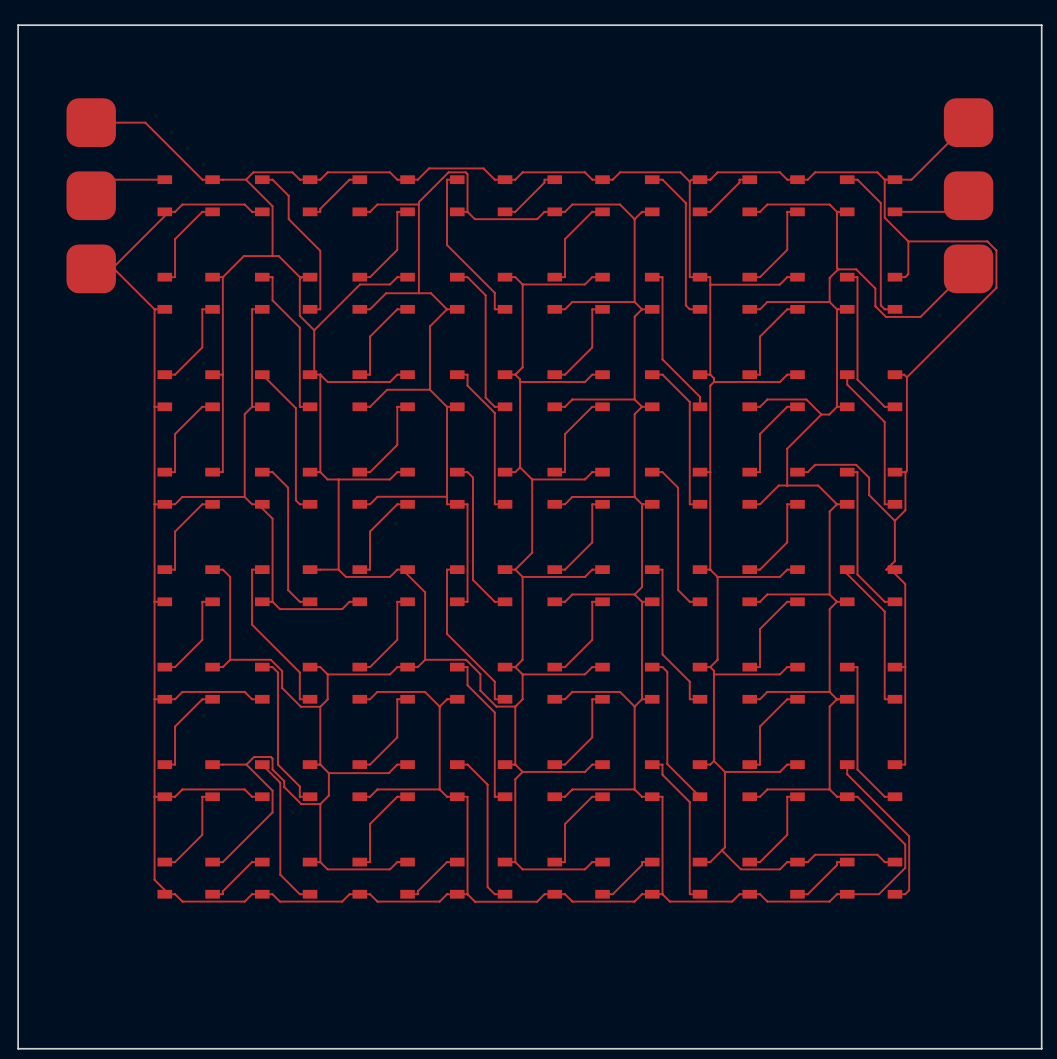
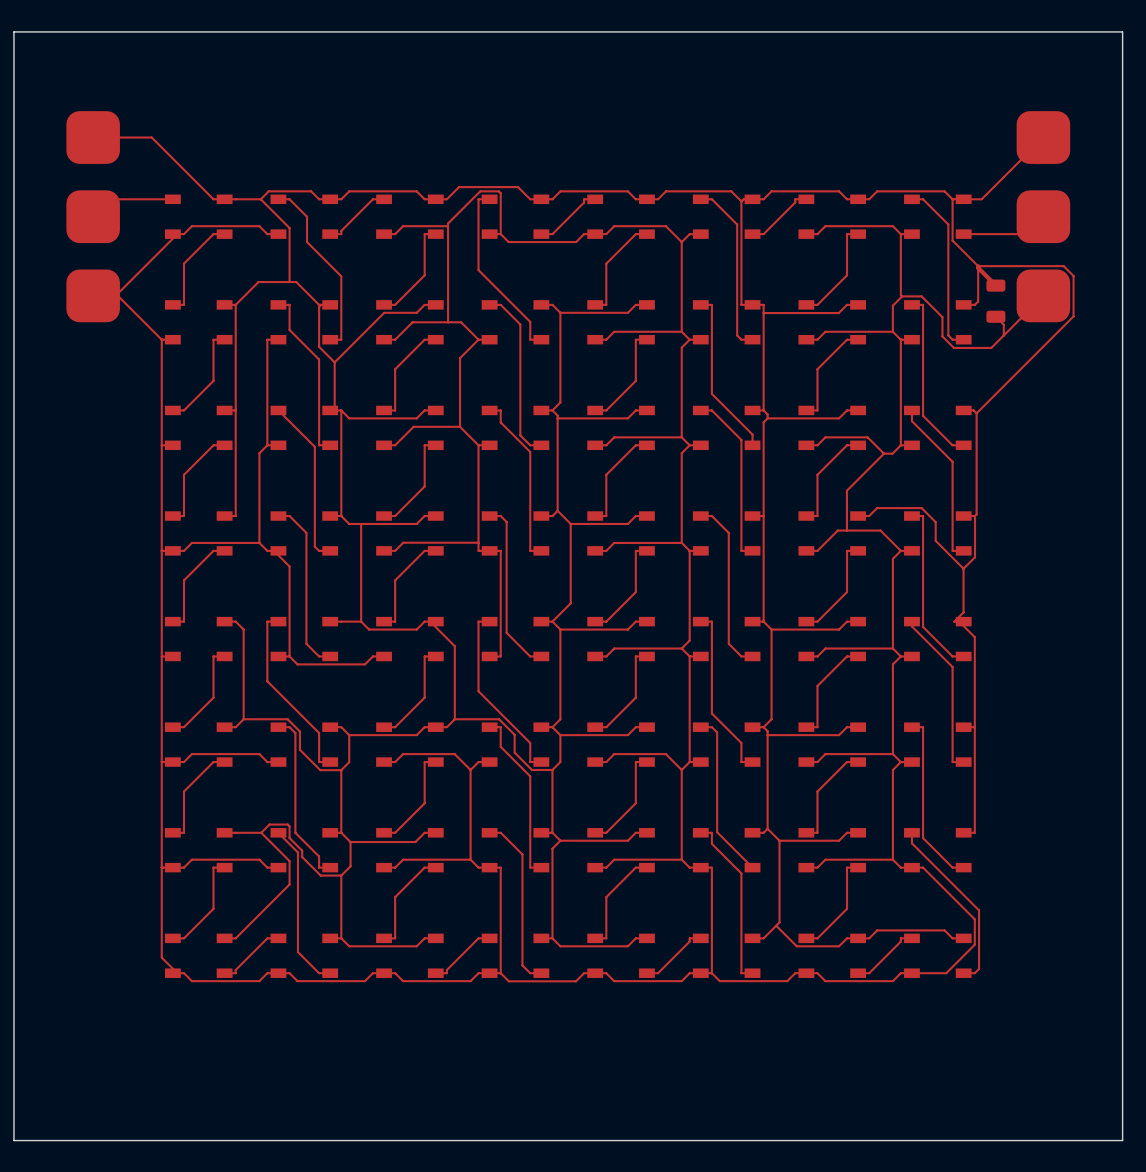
top track: none -> (978, 266) (995, 285)
part: none -> (995, 301)
top track: none -> (995, 316) (1003, 324) (1003, 335)

